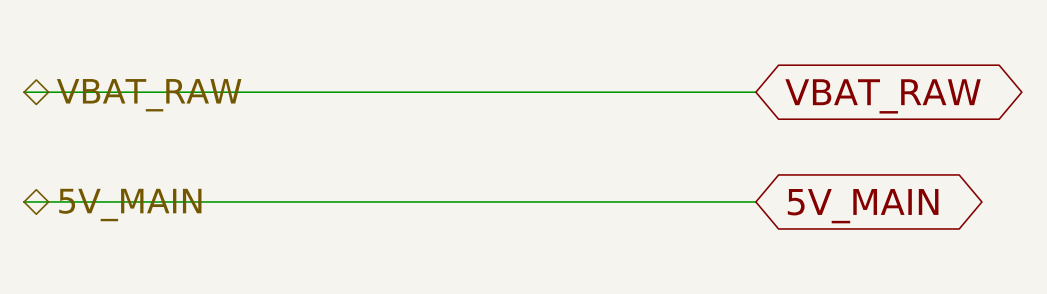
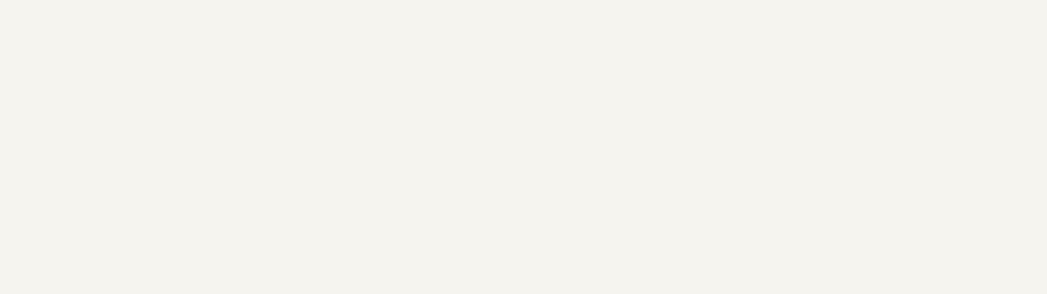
wire: (24, 92) (755, 92) -> none
hierarchical label: VBAT_RAW (149, 95) -> none
global label: VBAT_RAW (883, 96) -> none
wire: (24, 201) (755, 201) -> none
hierarchical label: 5V_MAIN (130, 205) -> none
global label: 5V_MAIN (863, 206) -> none

